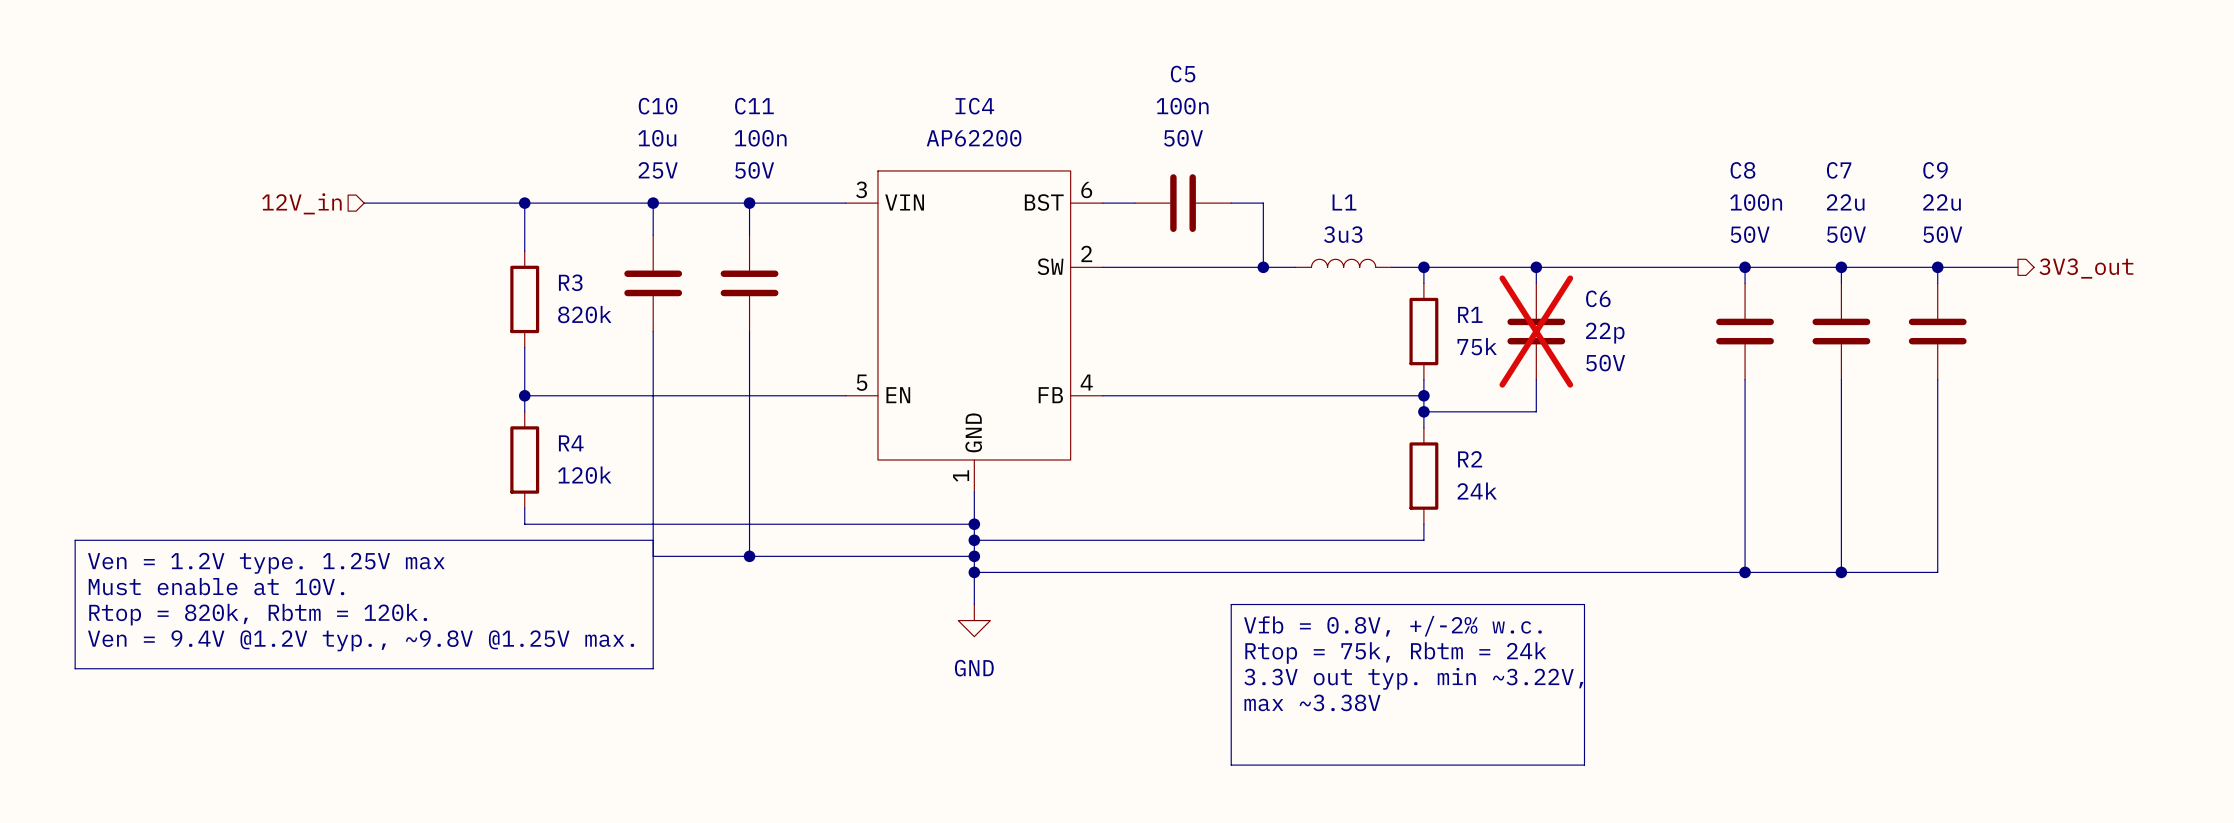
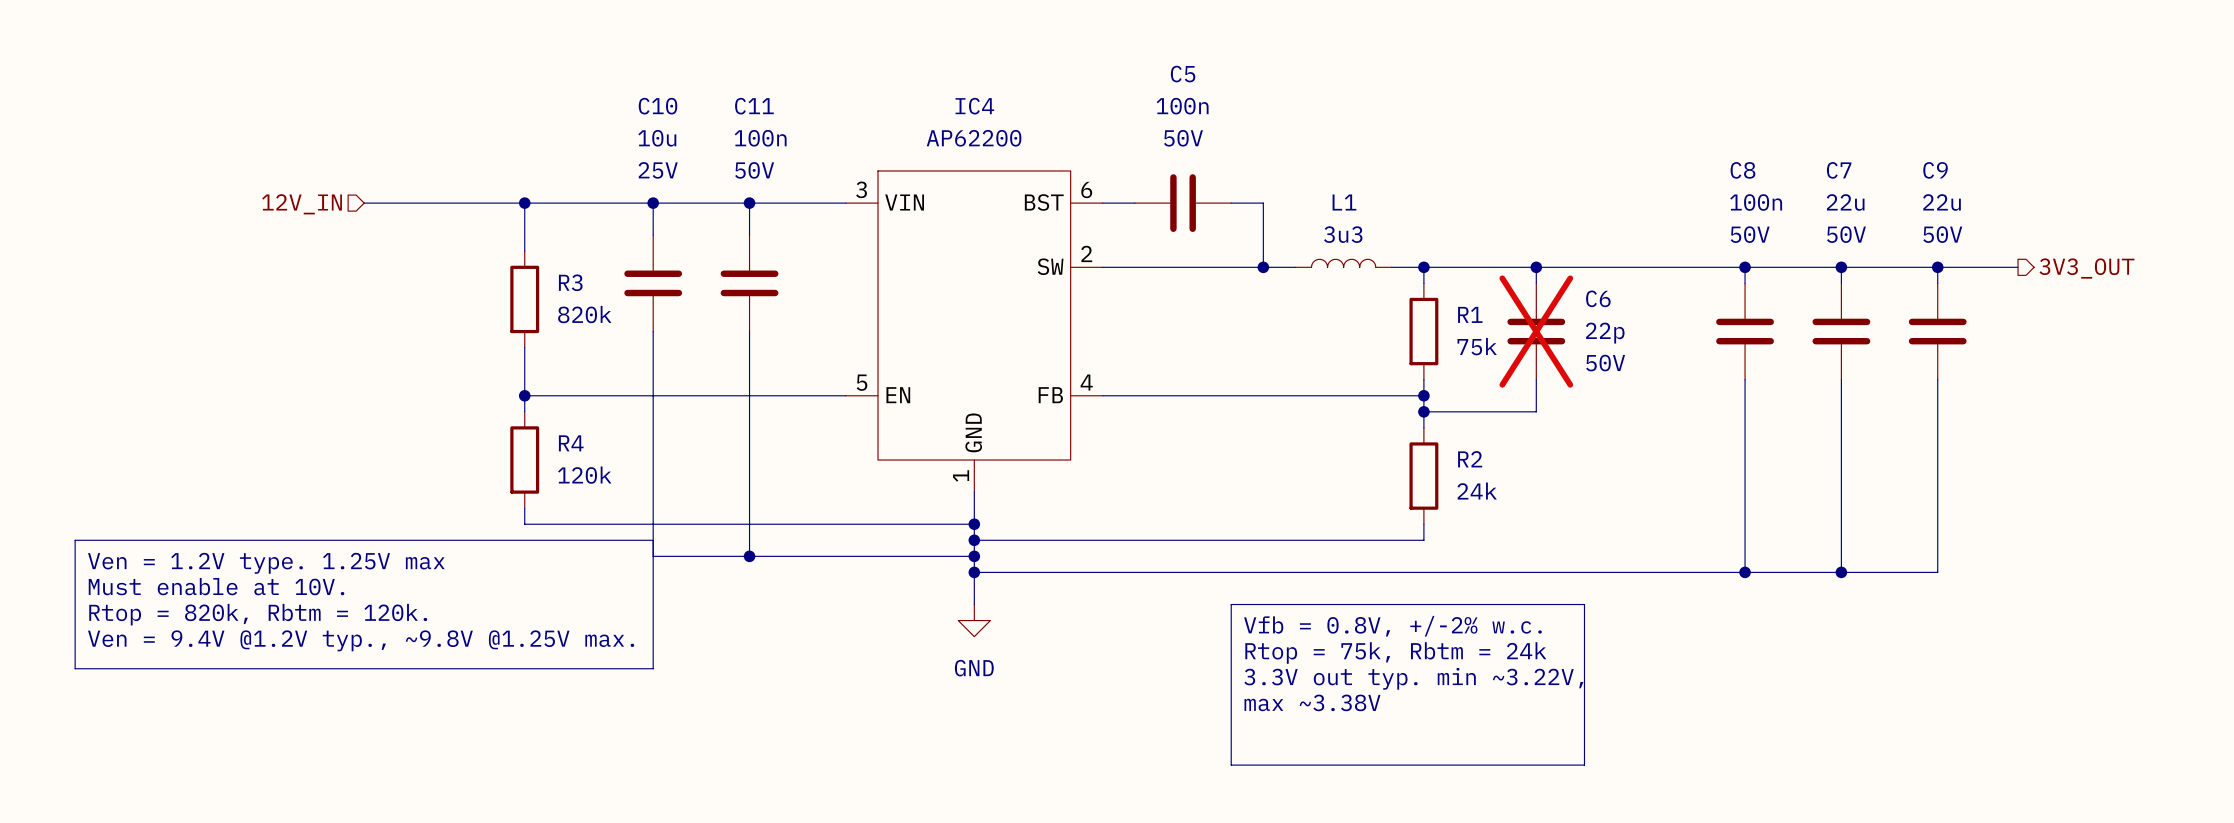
hierarchical label: 12V_in (301, 203) -> 12V_IN (302, 204)
hierarchical label: 3V3_out (2086, 268) -> 3V3_OUT (2086, 268)

